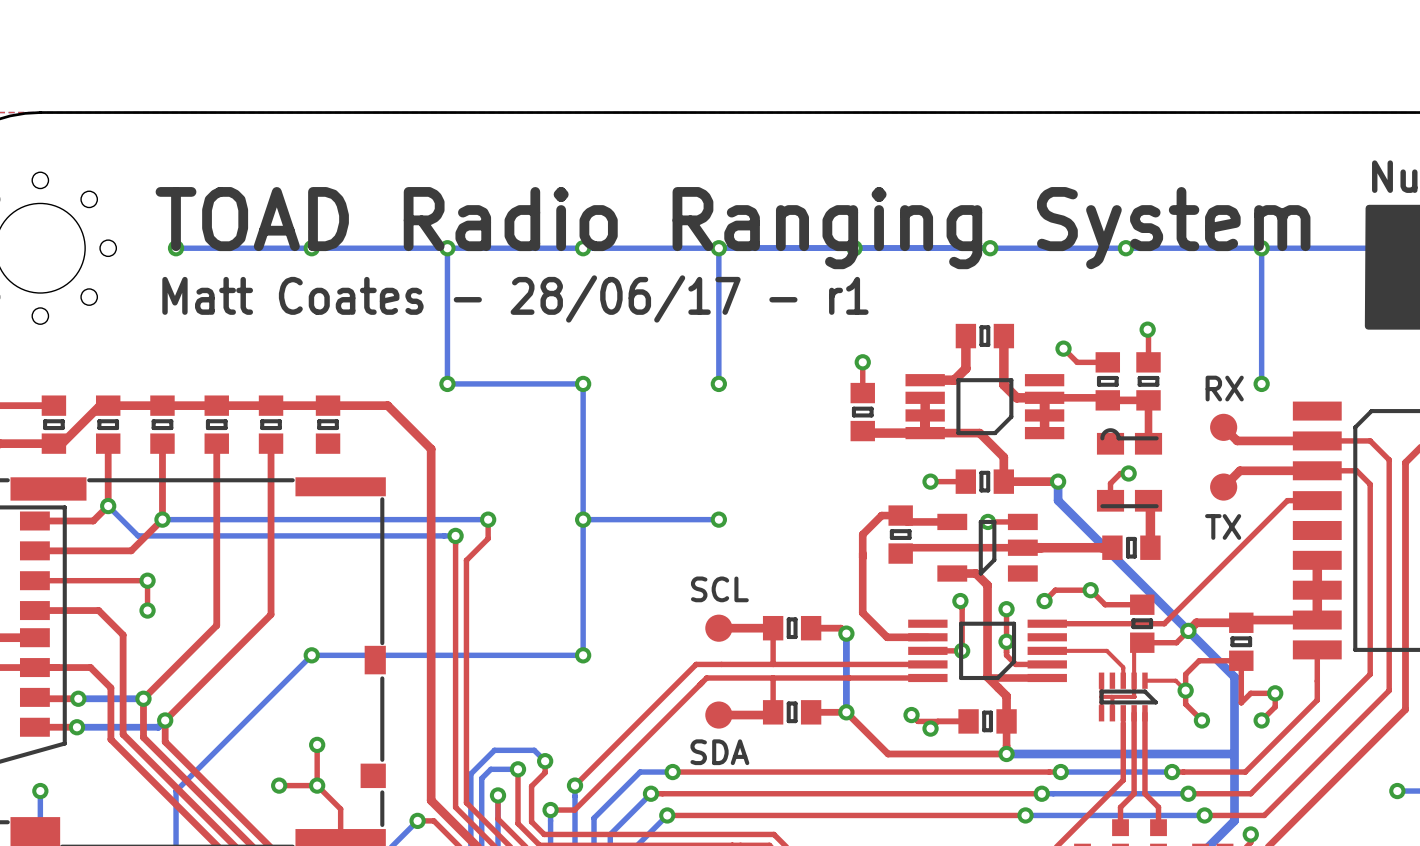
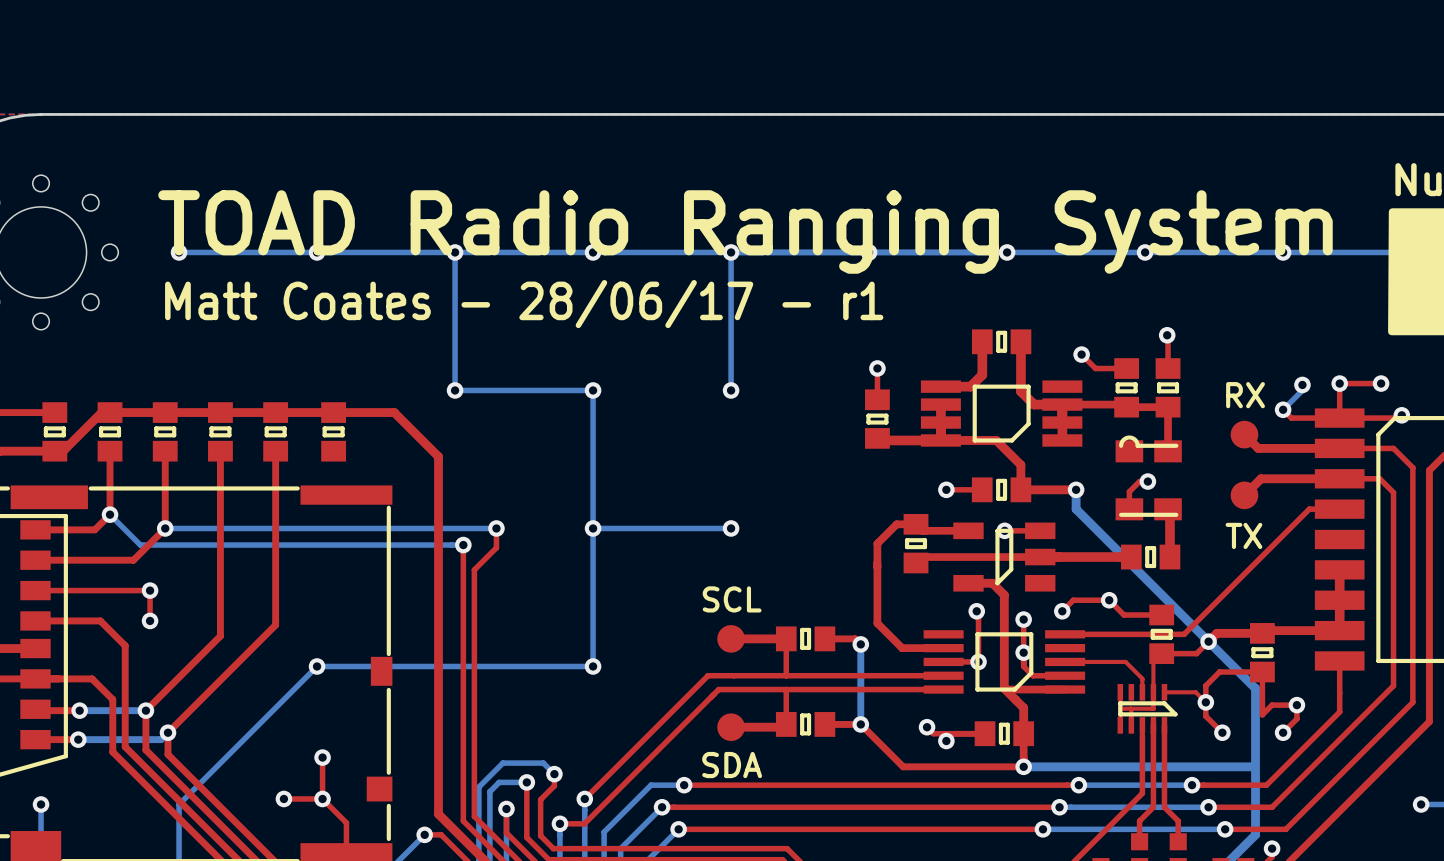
bottom track: (1261, 248) (1261, 383) -> none
via: none -> (1339, 383)
top track: none -> (1381, 383) (1339, 383) (1339, 418)
via: none -> (1381, 383)
bottom track: none -> (1302, 384) (1302, 390) (1283, 409)
via: none -> (1302, 384)
via: (1261, 383) -> none
top track: none -> (1283, 409) (1291, 418) (1399, 418) (1401, 415)
via: none -> (1283, 409)
via: none -> (1401, 415)

